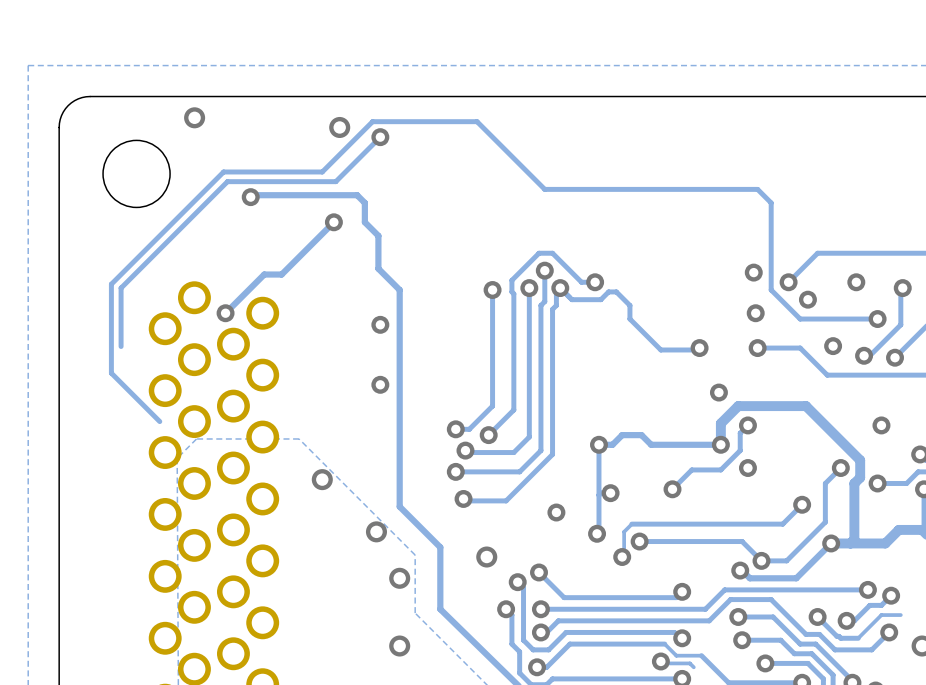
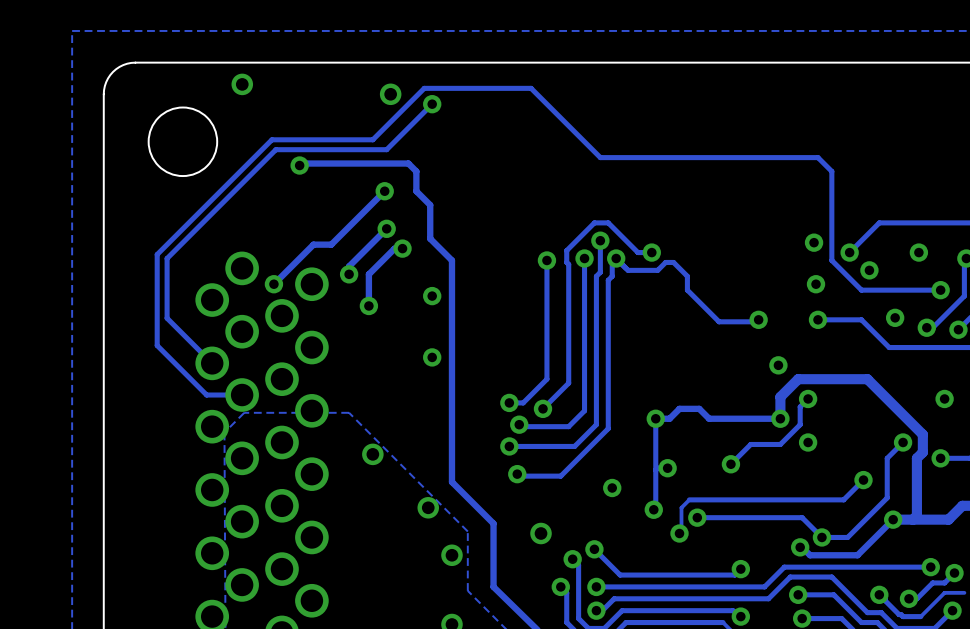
track: none -> (386, 228) (349, 266) (349, 274)
via: none -> (386, 228)
track: none -> (402, 248) (394, 248) (368, 274) (368, 305)
via: none -> (402, 248)
via: none -> (349, 274)
via: none -> (368, 305)
track: none -> (167, 318) (212, 363)
track: none -> (242, 395) (206, 395)

